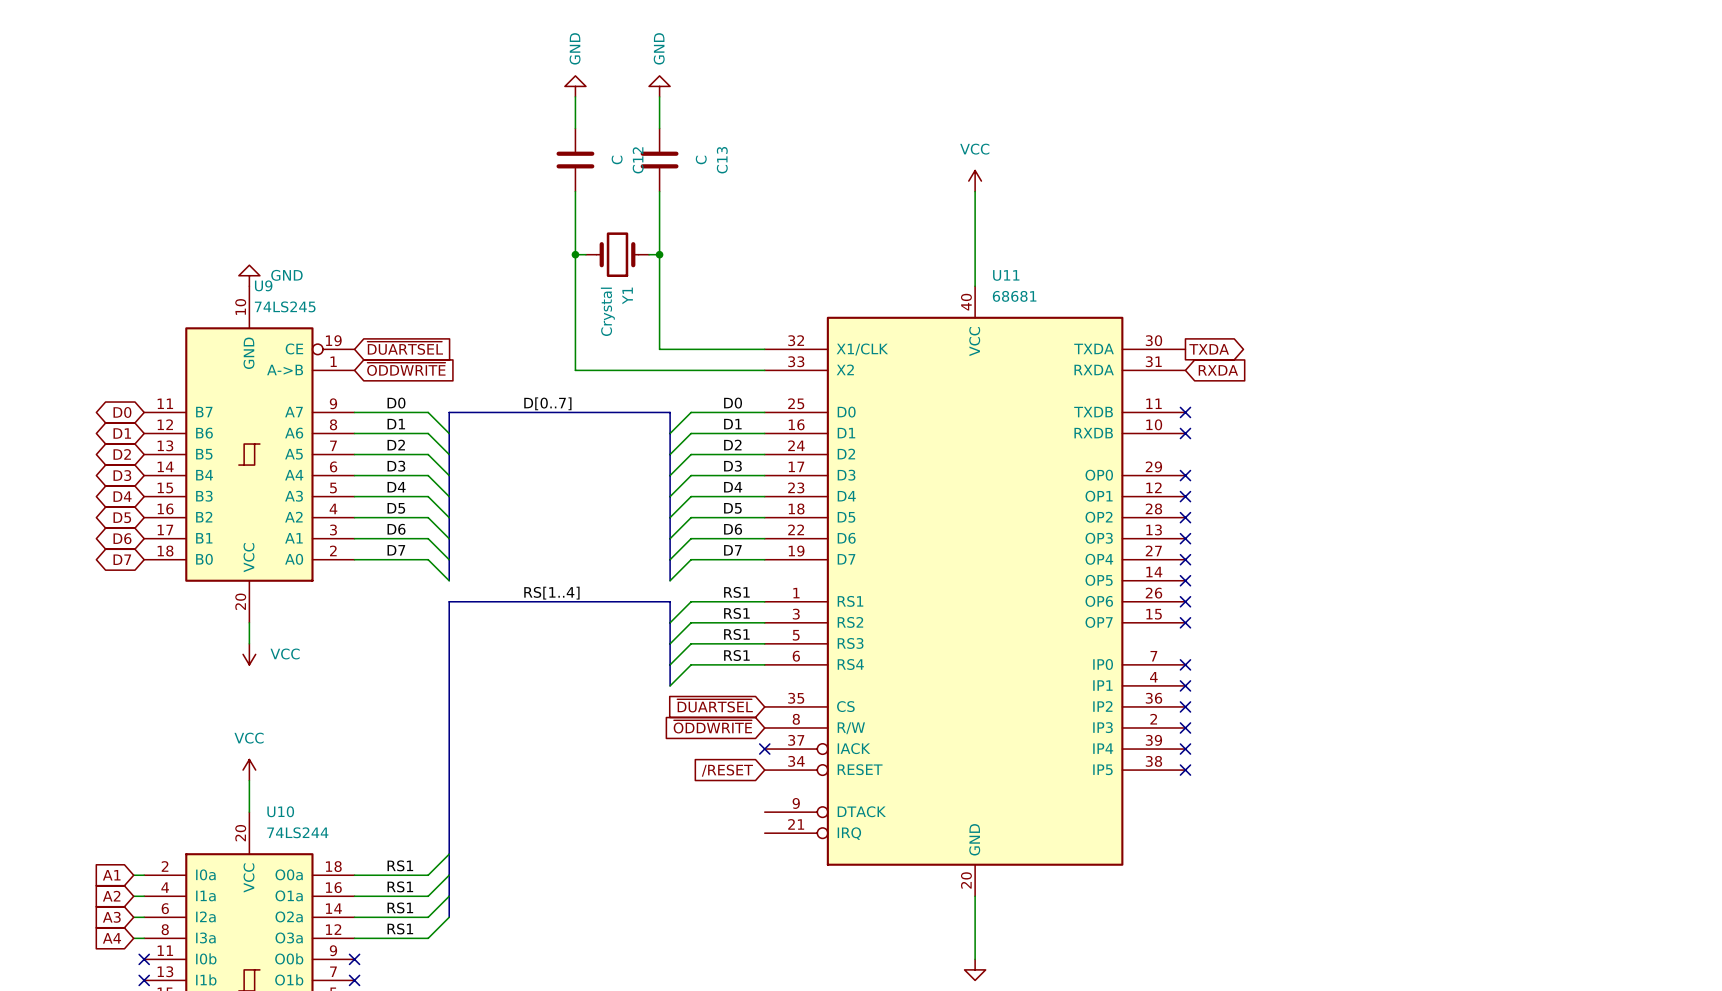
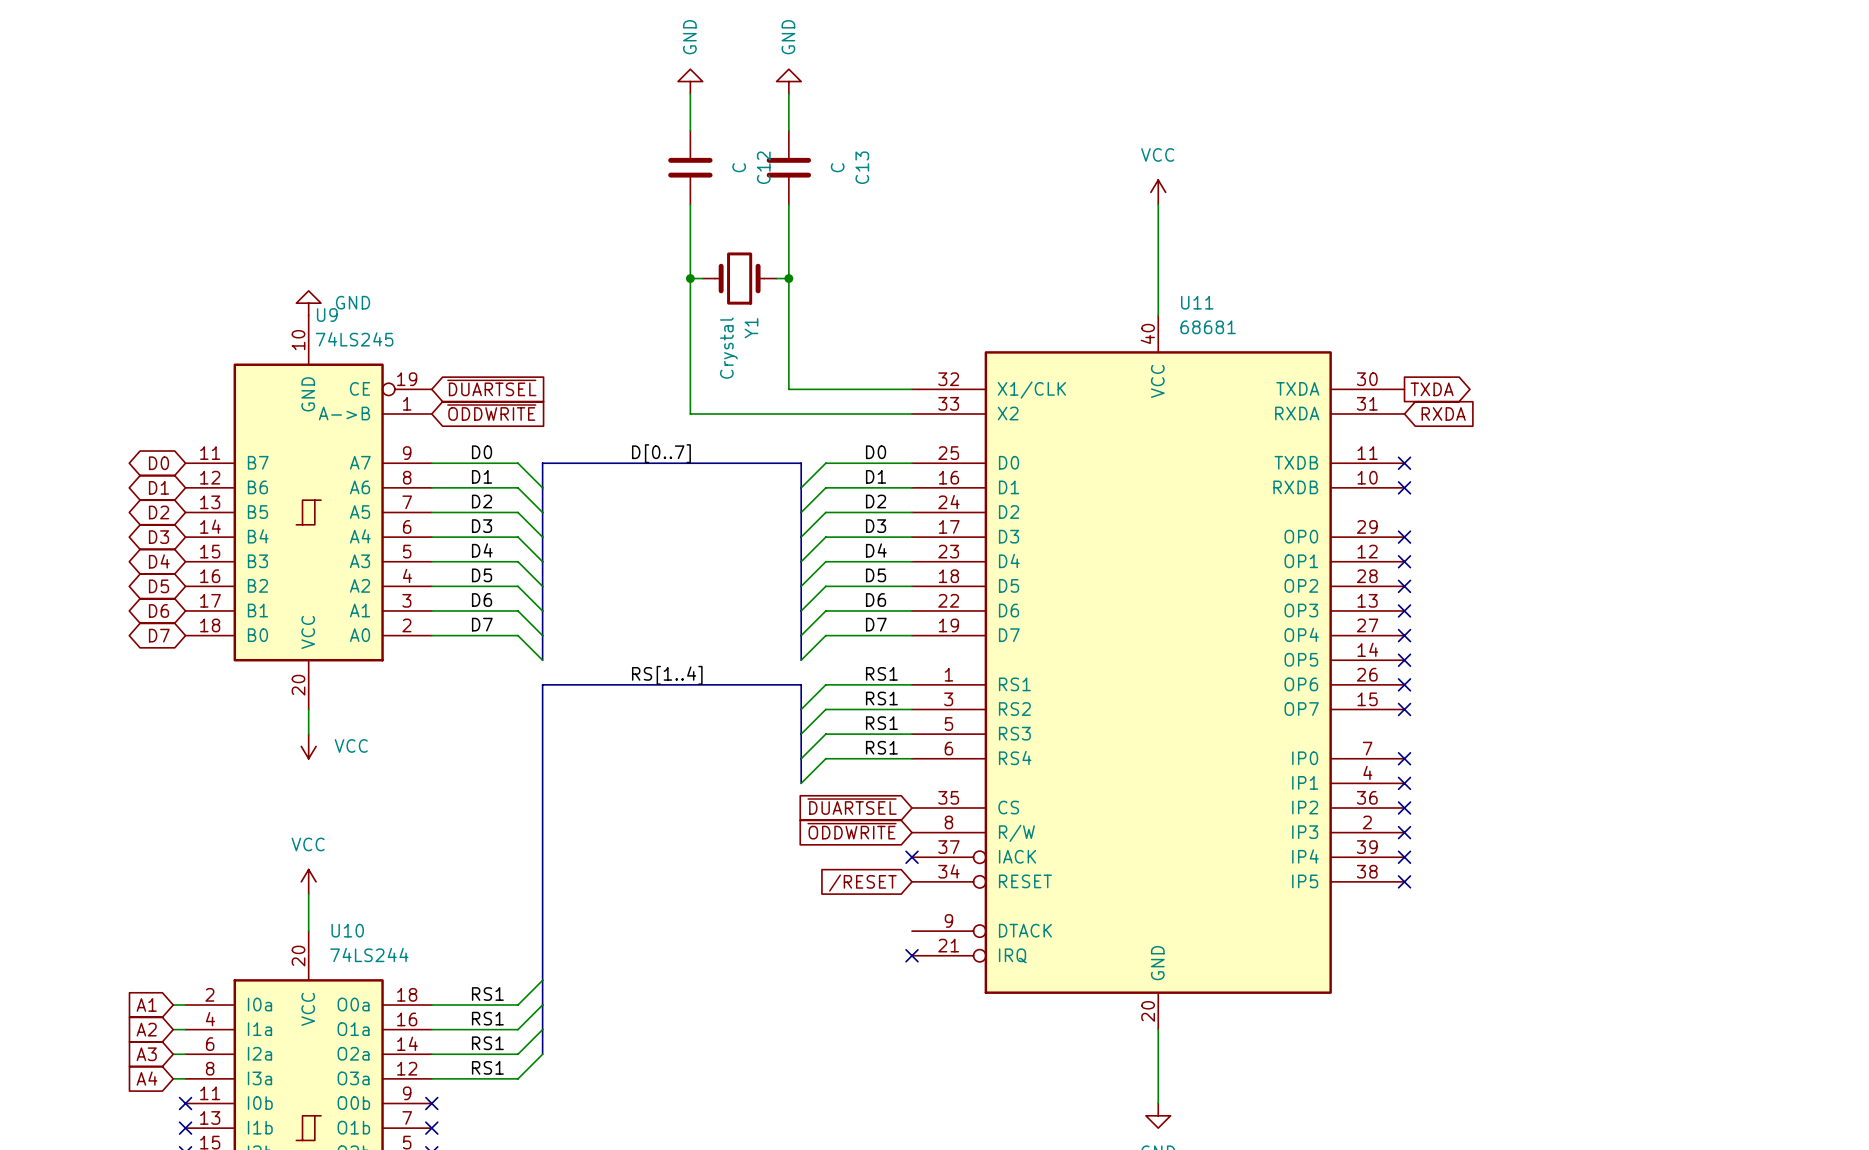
no-connect mark: none -> (912, 955)

